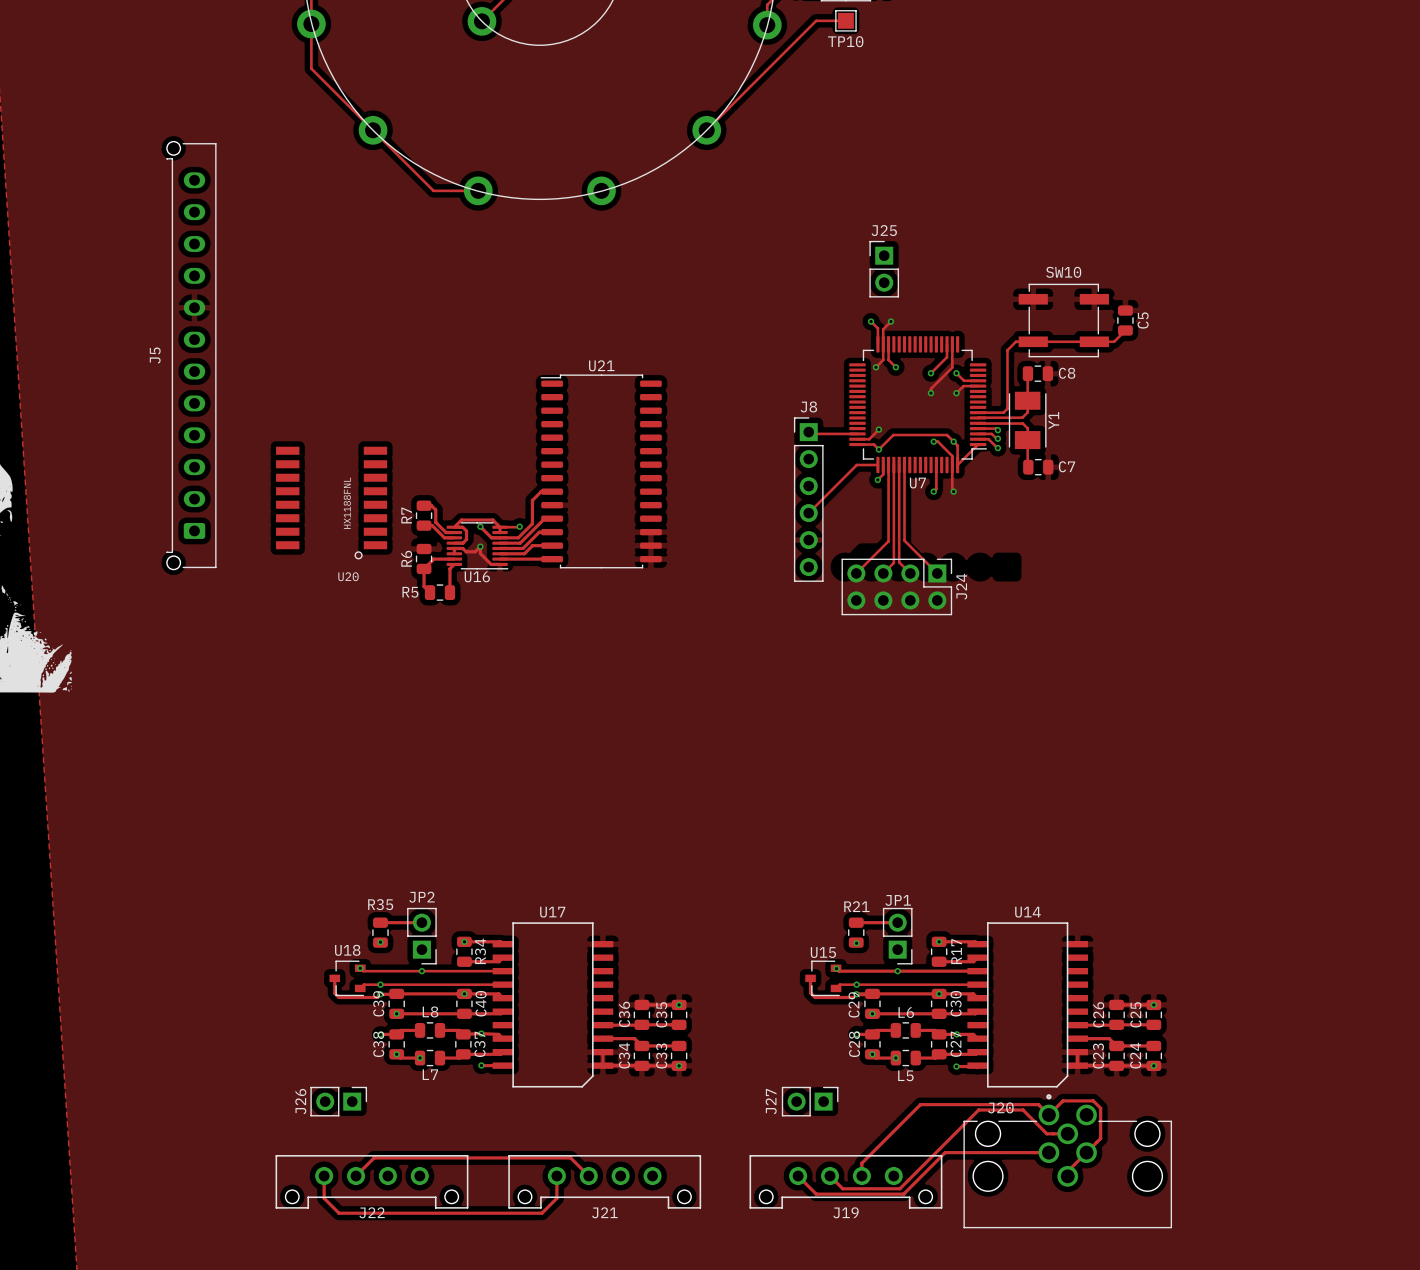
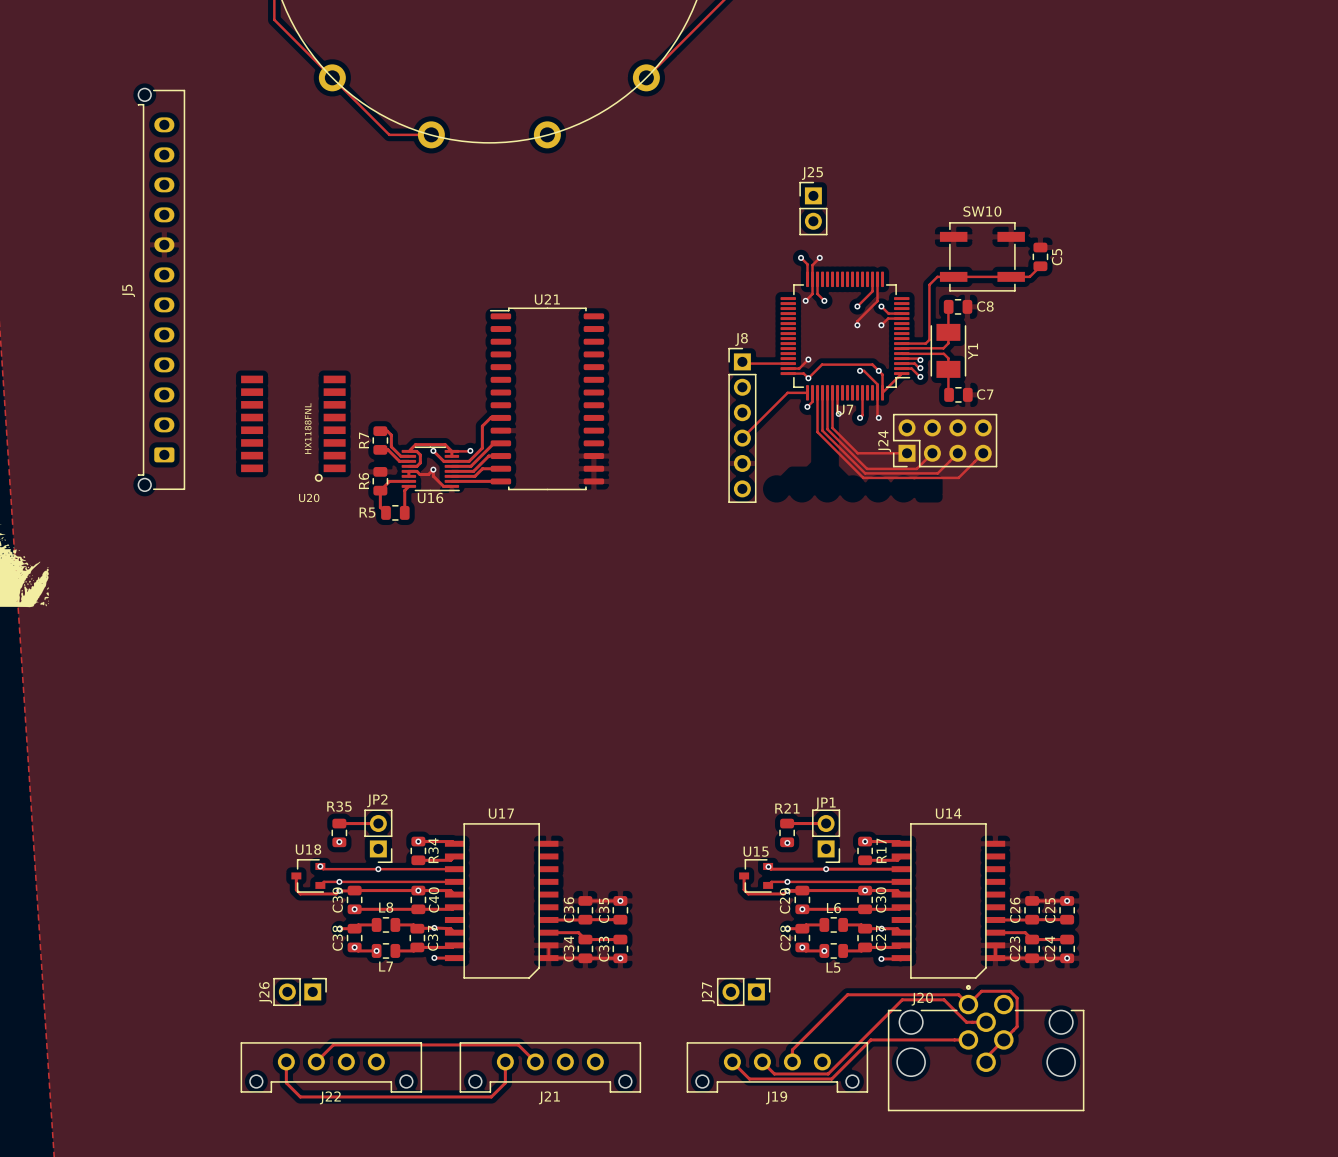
track: none -> (837, 392) (838, 413)
via: none -> (838, 413)
track: (904, 502) (904, 540) (937, 573) -> (832, 427) (857, 453) (907, 453)
track: (899, 503) (899, 562) (910, 573) -> (827, 429) (867, 468) (916, 468) (932, 453)
track: (893, 505) (893, 562) (883, 573) -> (822, 430) (865, 473) (937, 473) (957, 453)
track: (888, 506) (888, 541) -> (817, 432) (863, 477) (958, 477) (983, 453)
track: (888, 541) (856, 573) -> none
J24 rotation: 0° (896, 586) -> 180° (945, 440)
J24 position: (896, 586) -> (945, 440)

